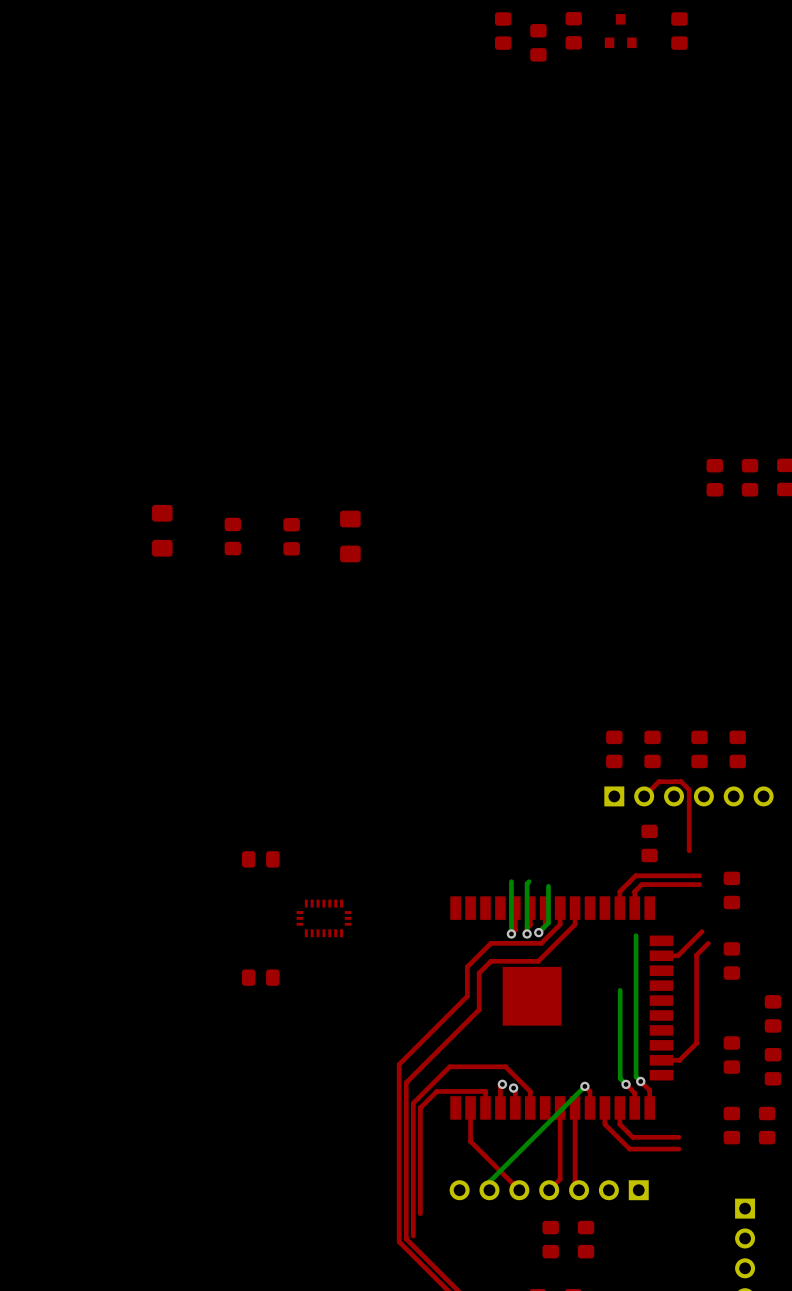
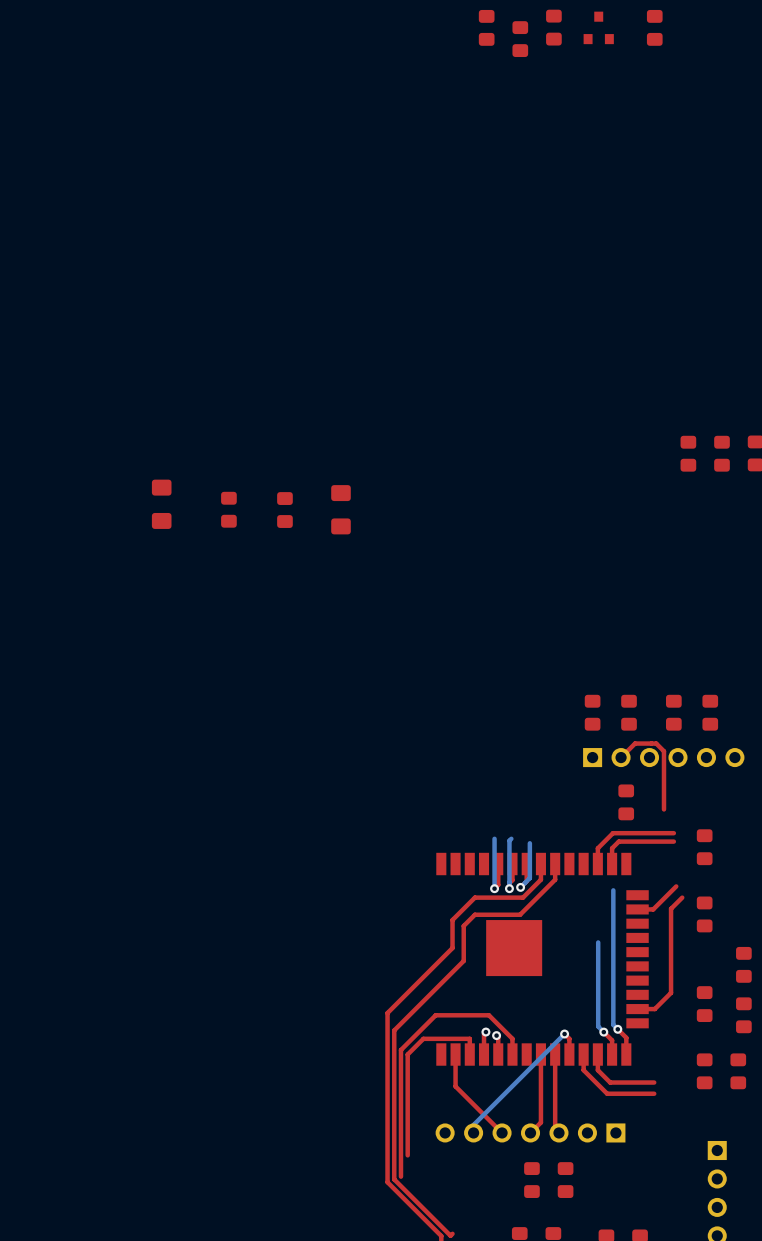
part: (260, 859) -> none
part: (323, 918) -> none
part: (260, 977) -> none

